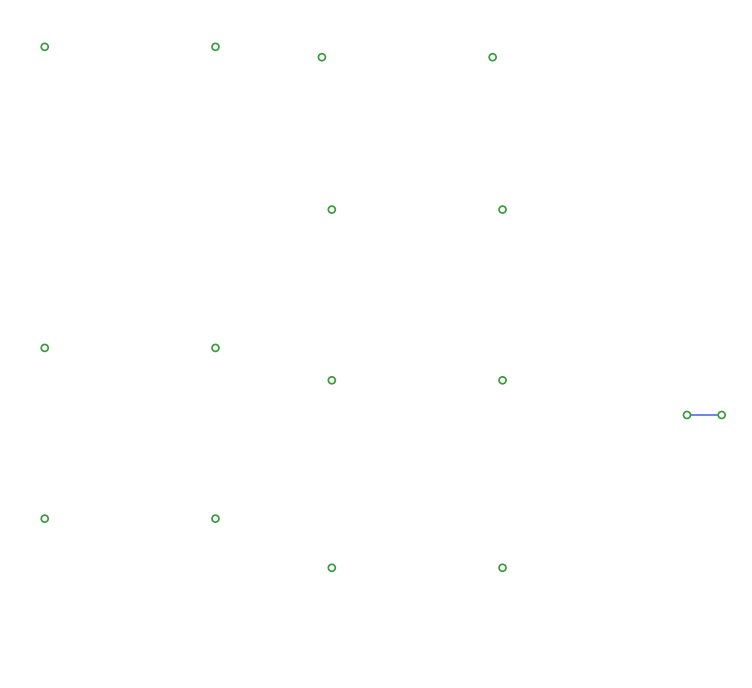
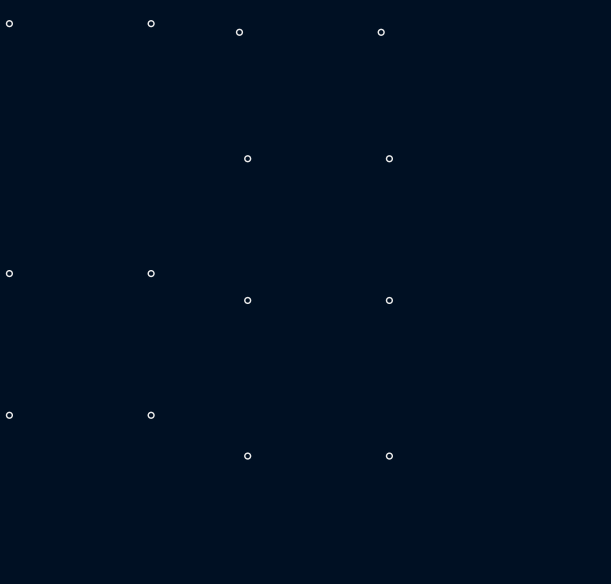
via: (686, 414) -> none
track: (721, 414) (686, 414) -> none
via: (721, 414) -> none

